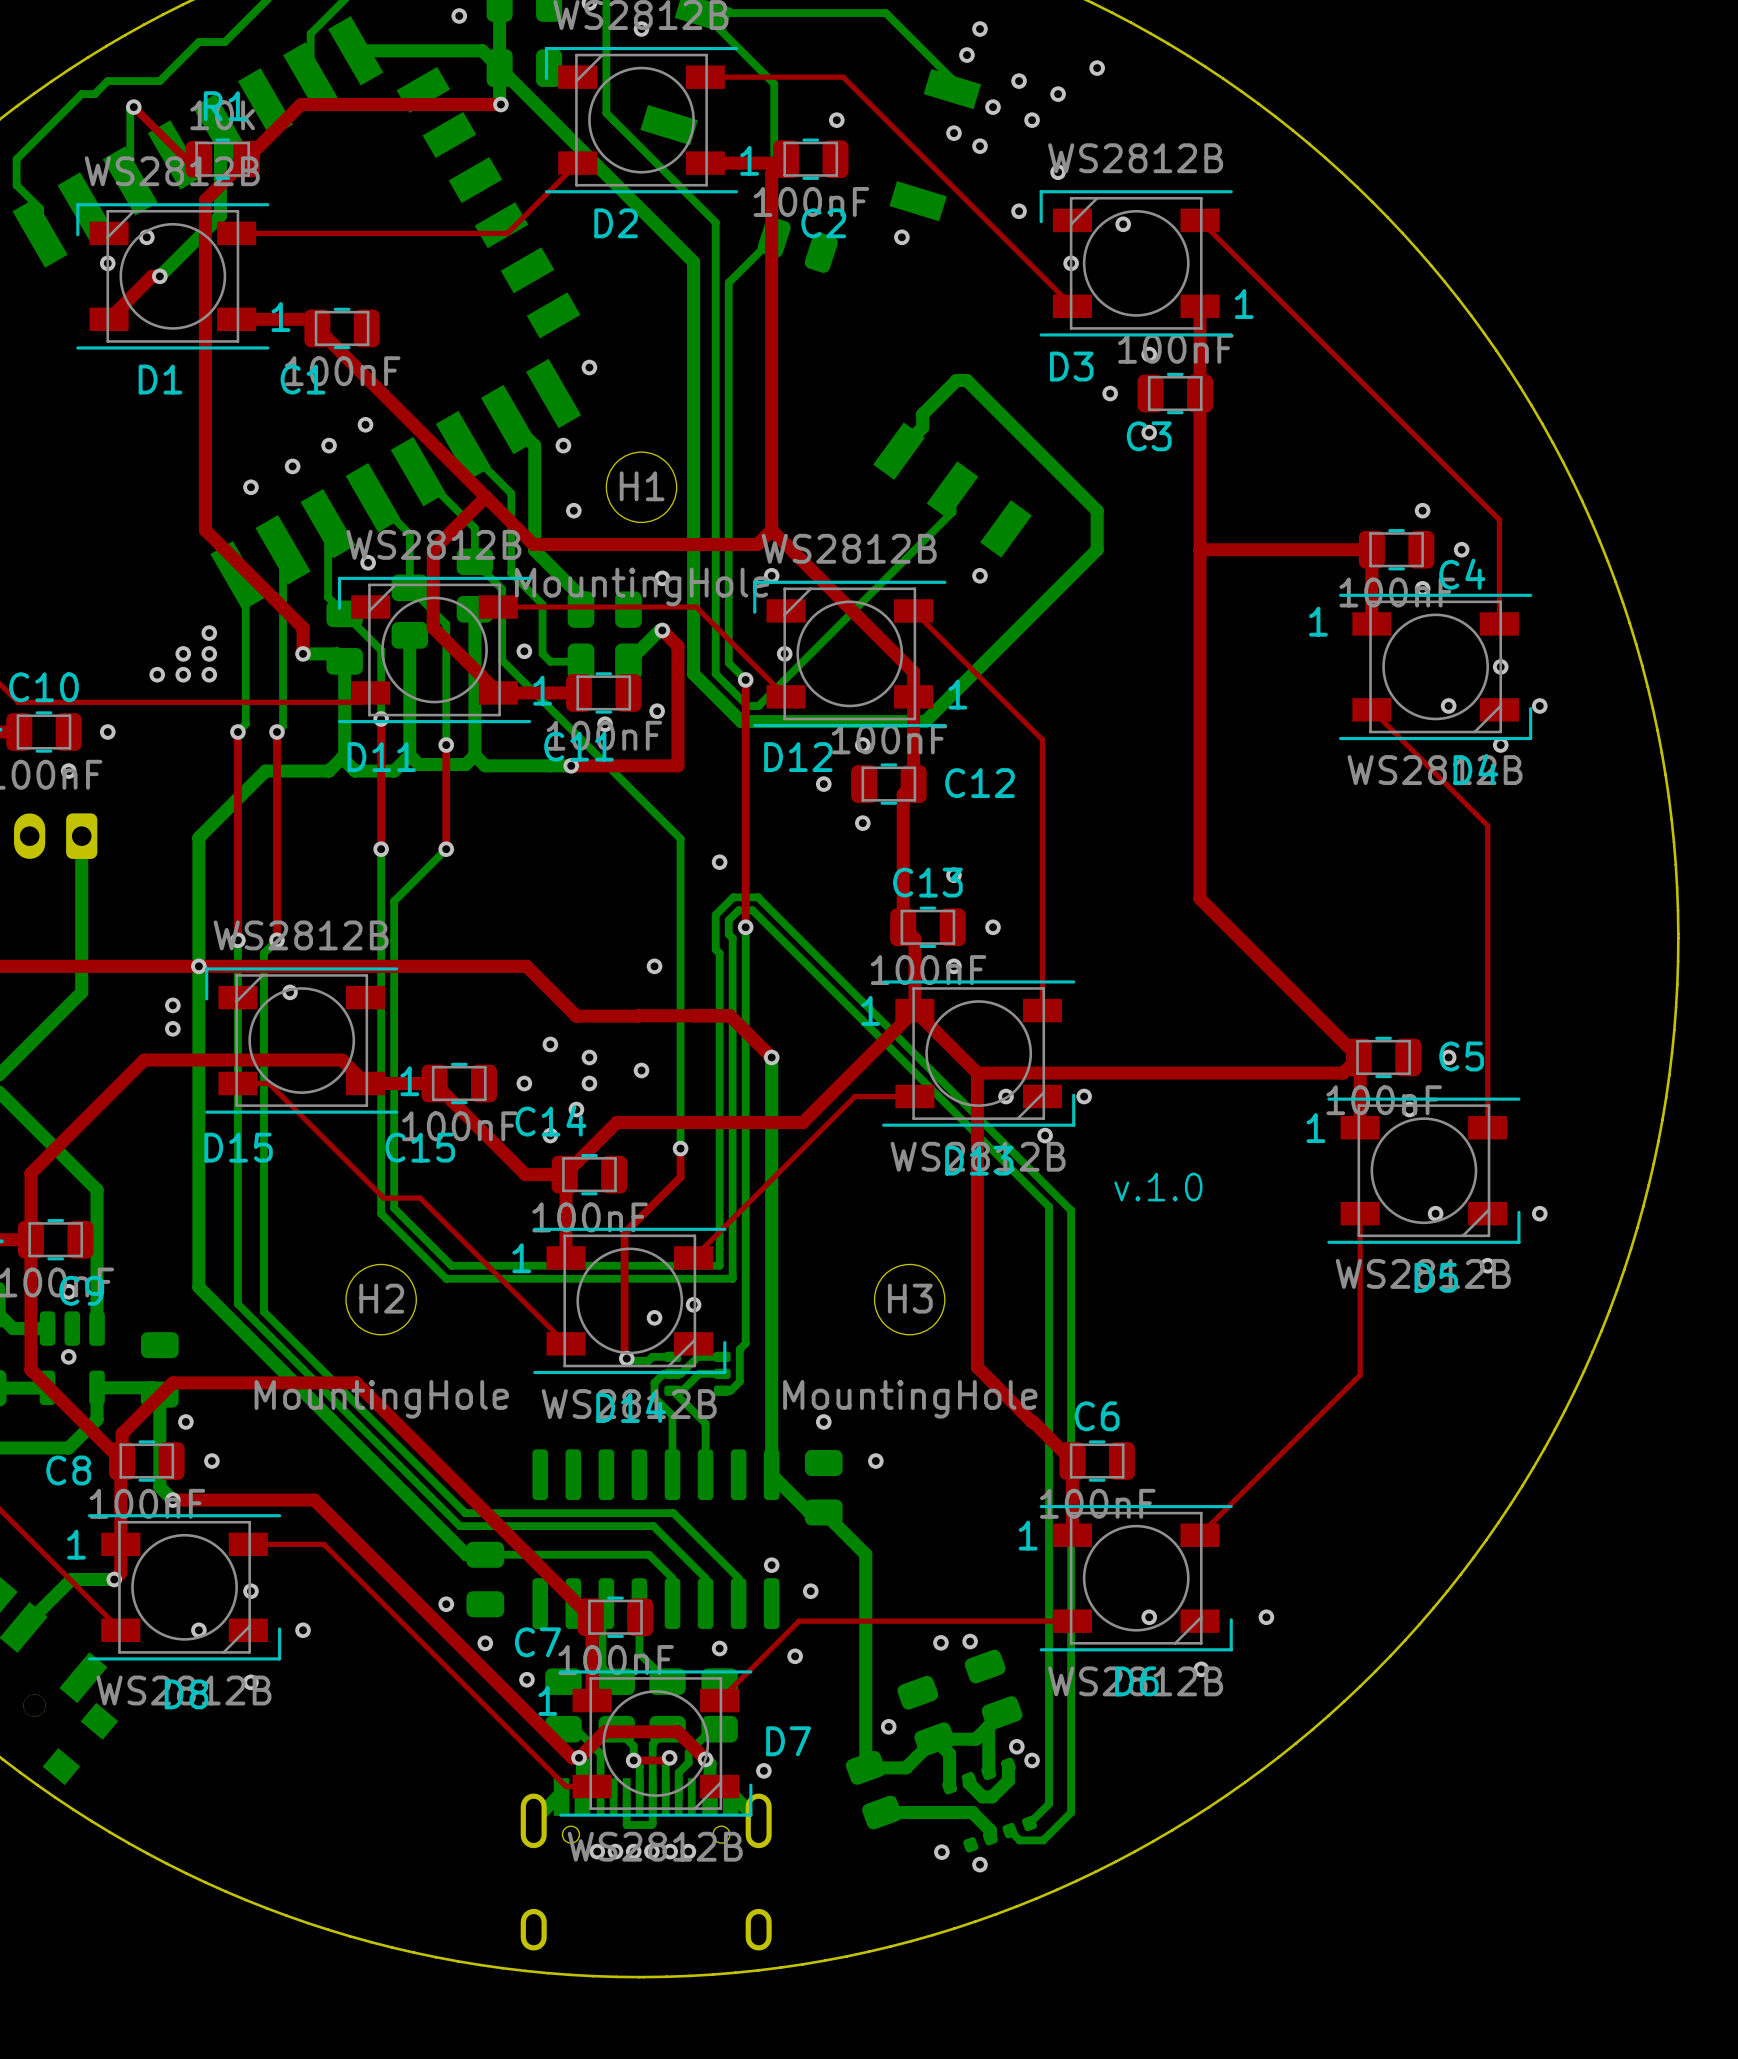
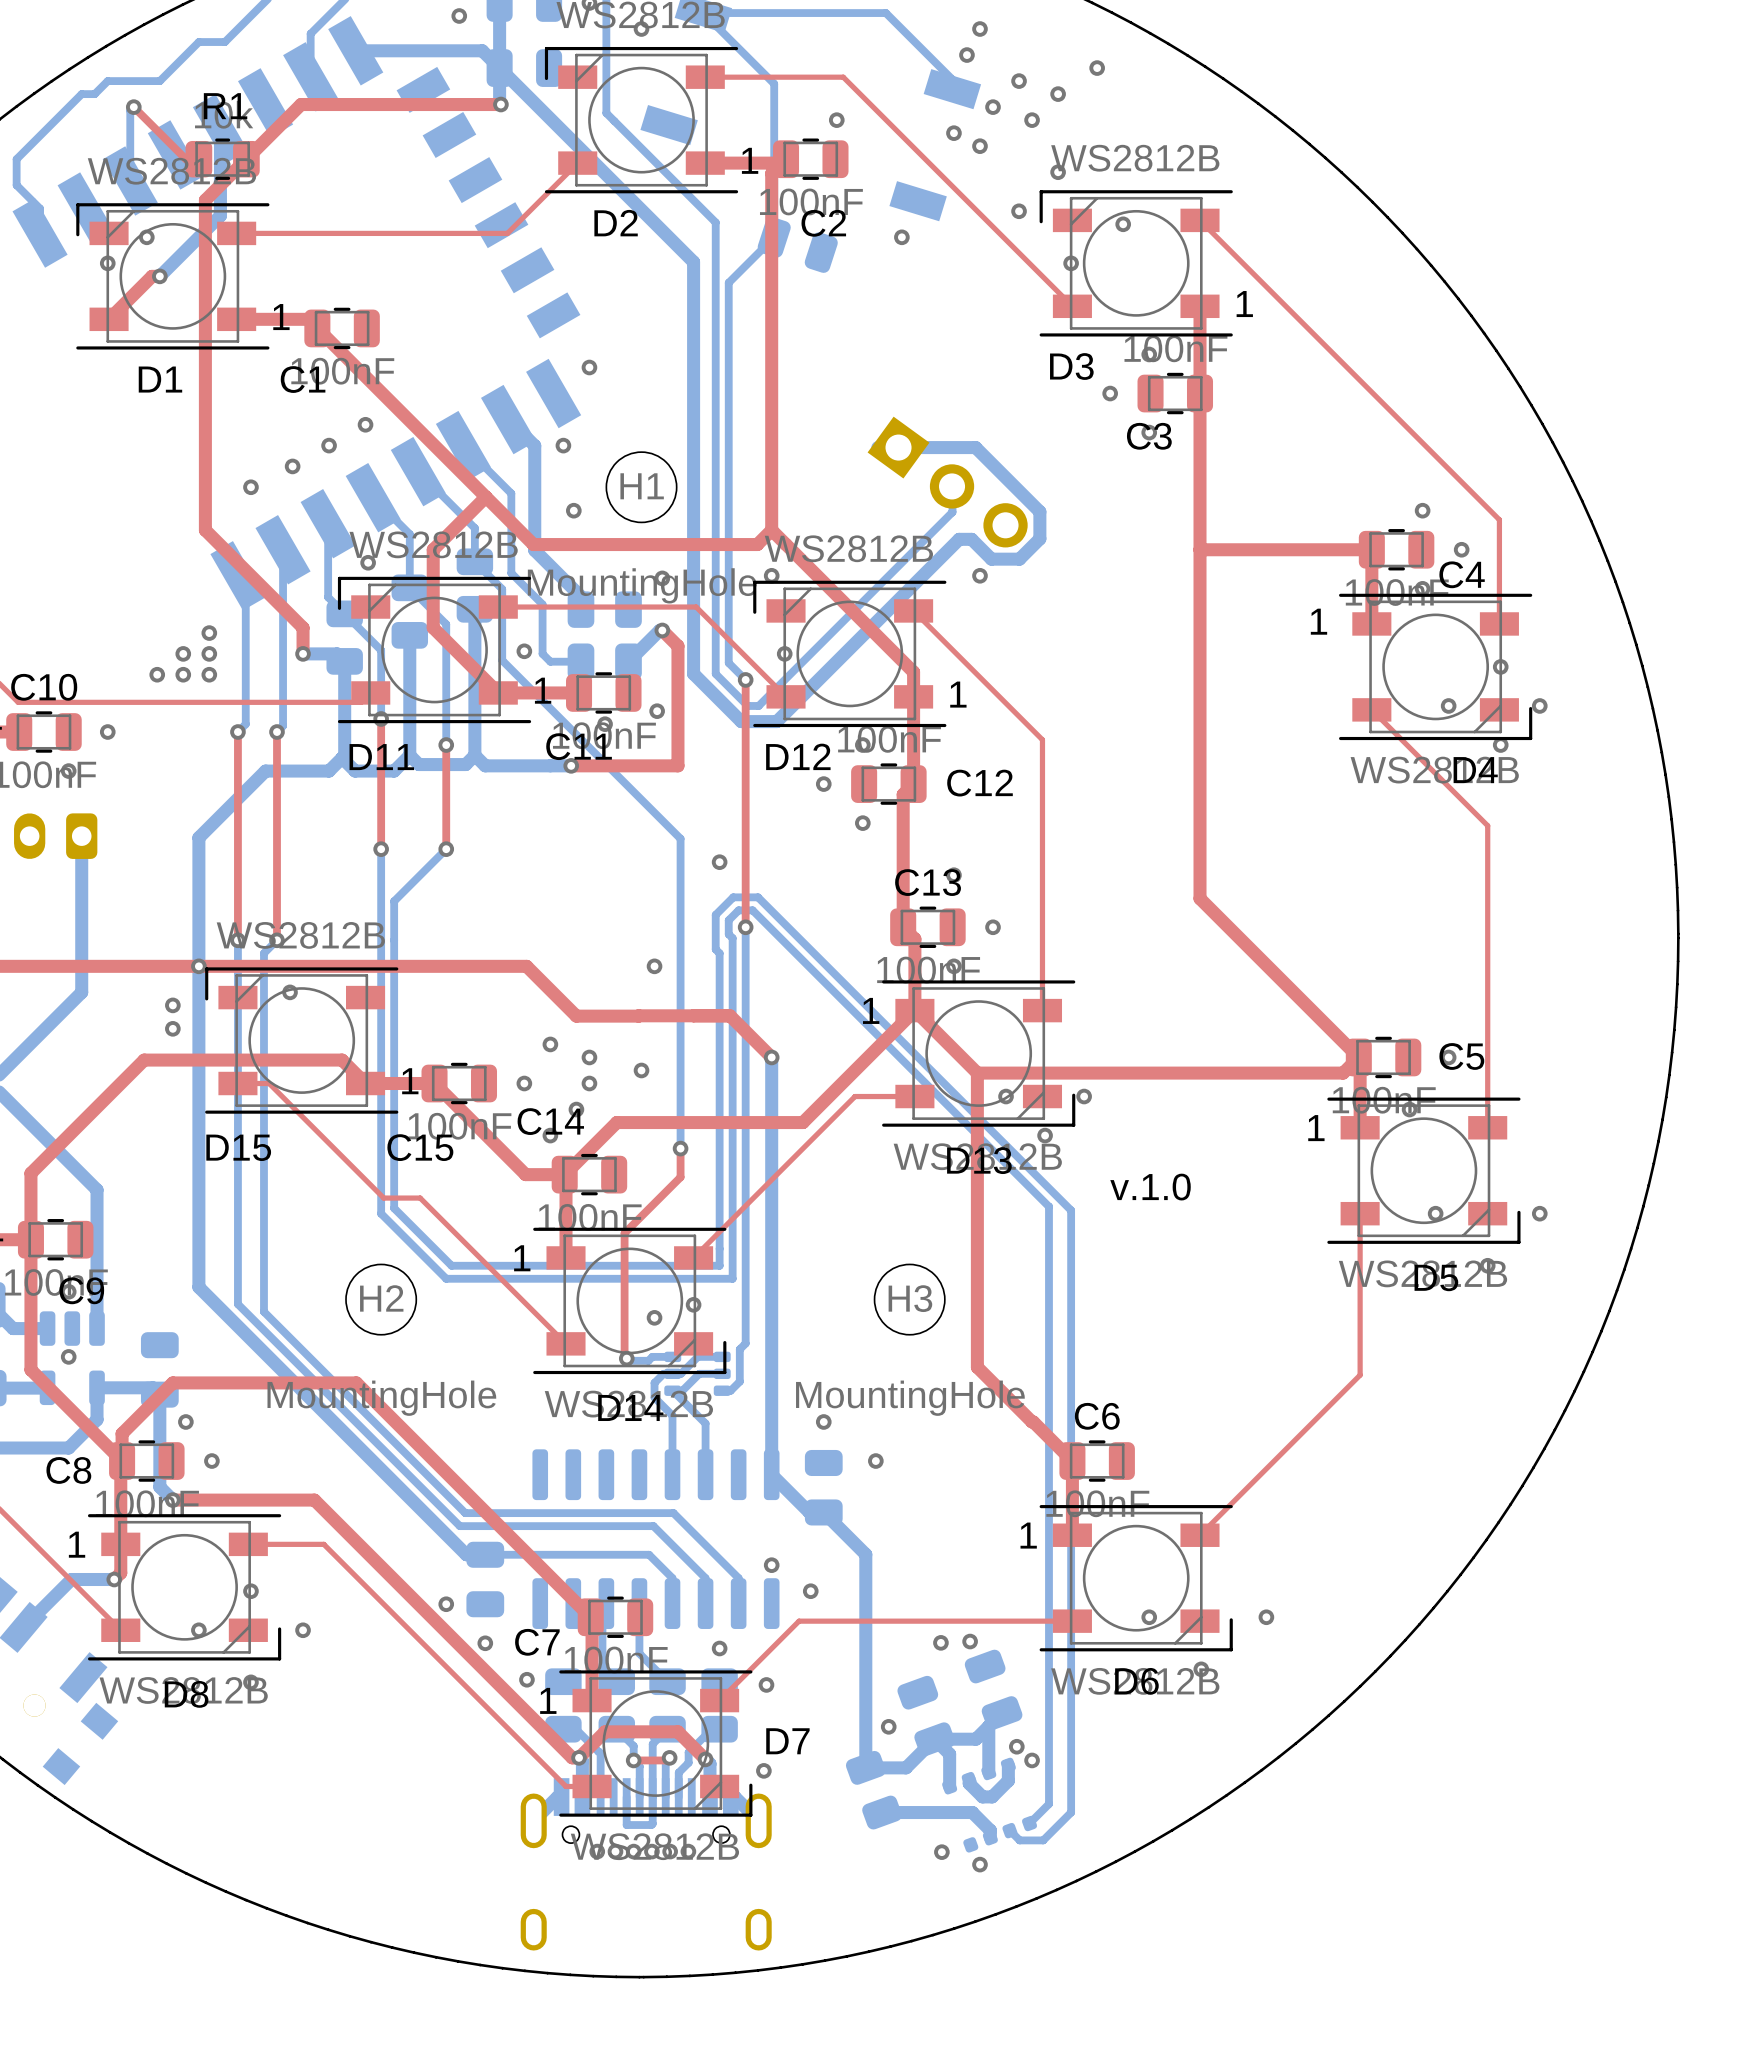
part footprint: [873, 422, 1032, 558] -> [867, 416, 1028, 548]
bottom track: (899, 451) (922, 427) (922, 414) (956, 380) (966, 380) (1097, 510) (1097, 549) (925, 721) (776, 721) -> (877, 447) (975, 447) (1039, 511) (1039, 538) (1019, 559) (991, 559) (971, 539) (959, 539) (776, 721)
via position: (795, 1656) -> (766, 1684)

